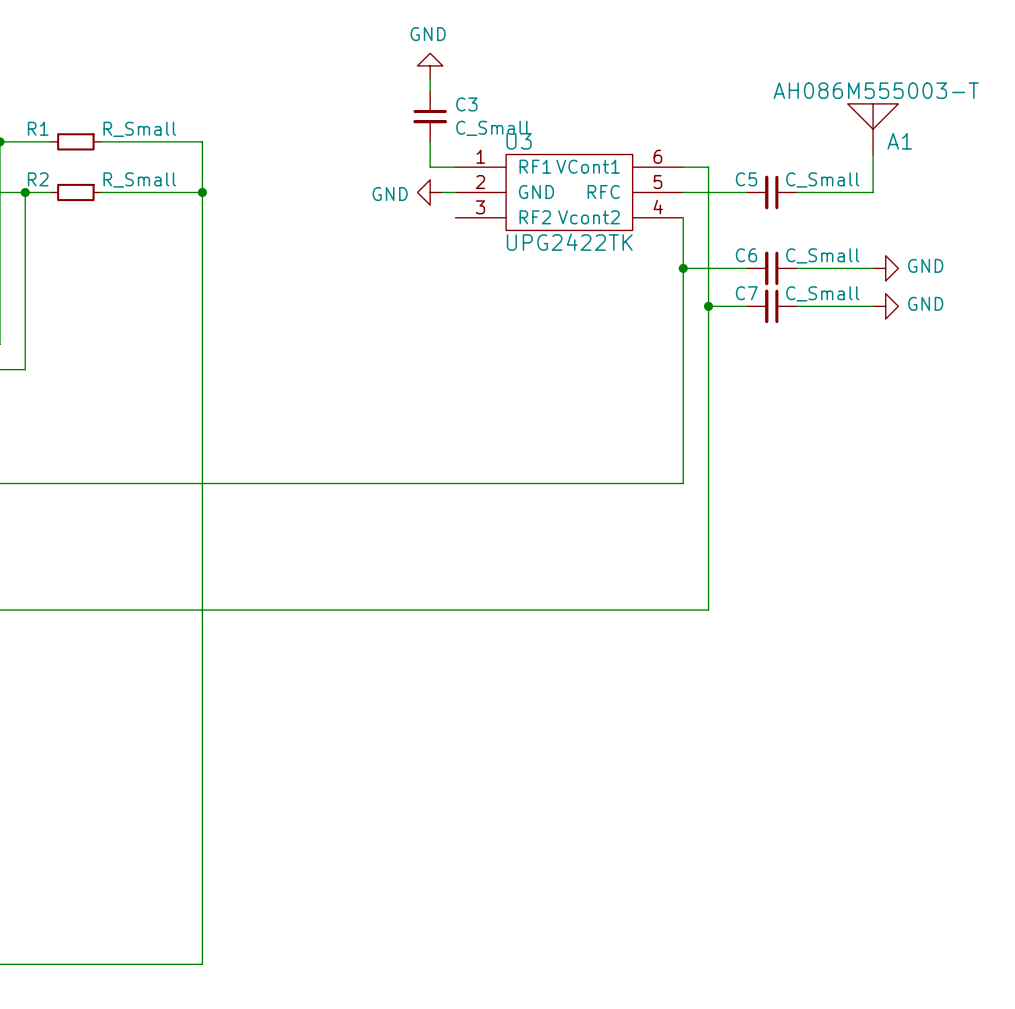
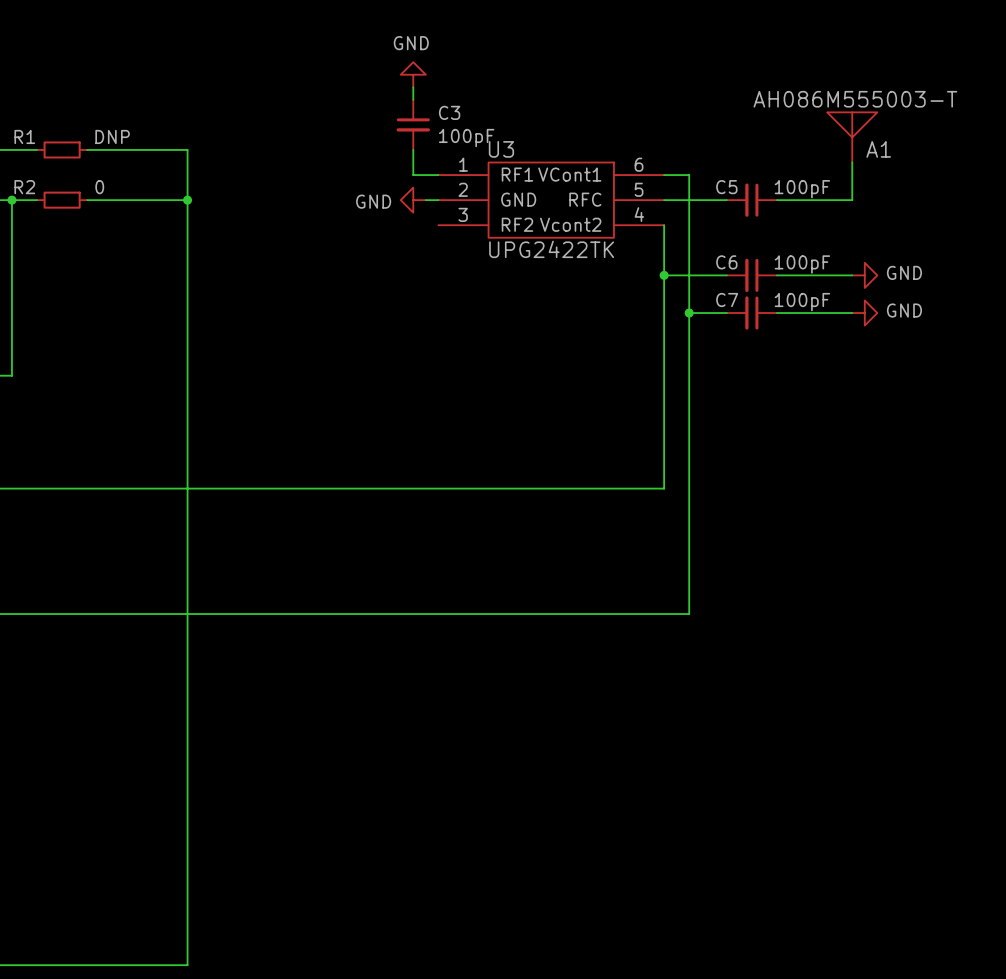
C3 value: C_Small (492, 128) -> 100pF (466, 138)
R1 value: R_Small (139, 129) -> DNP (112, 136)
R2 value: R_Small (139, 179) -> 0 (99, 187)
C5 value: C_Small (822, 179) -> 100pF (802, 189)
C6 value: C_Small (822, 255) -> 100pF (802, 264)
C7 value: C_Small (822, 293) -> 100pF (802, 302)

